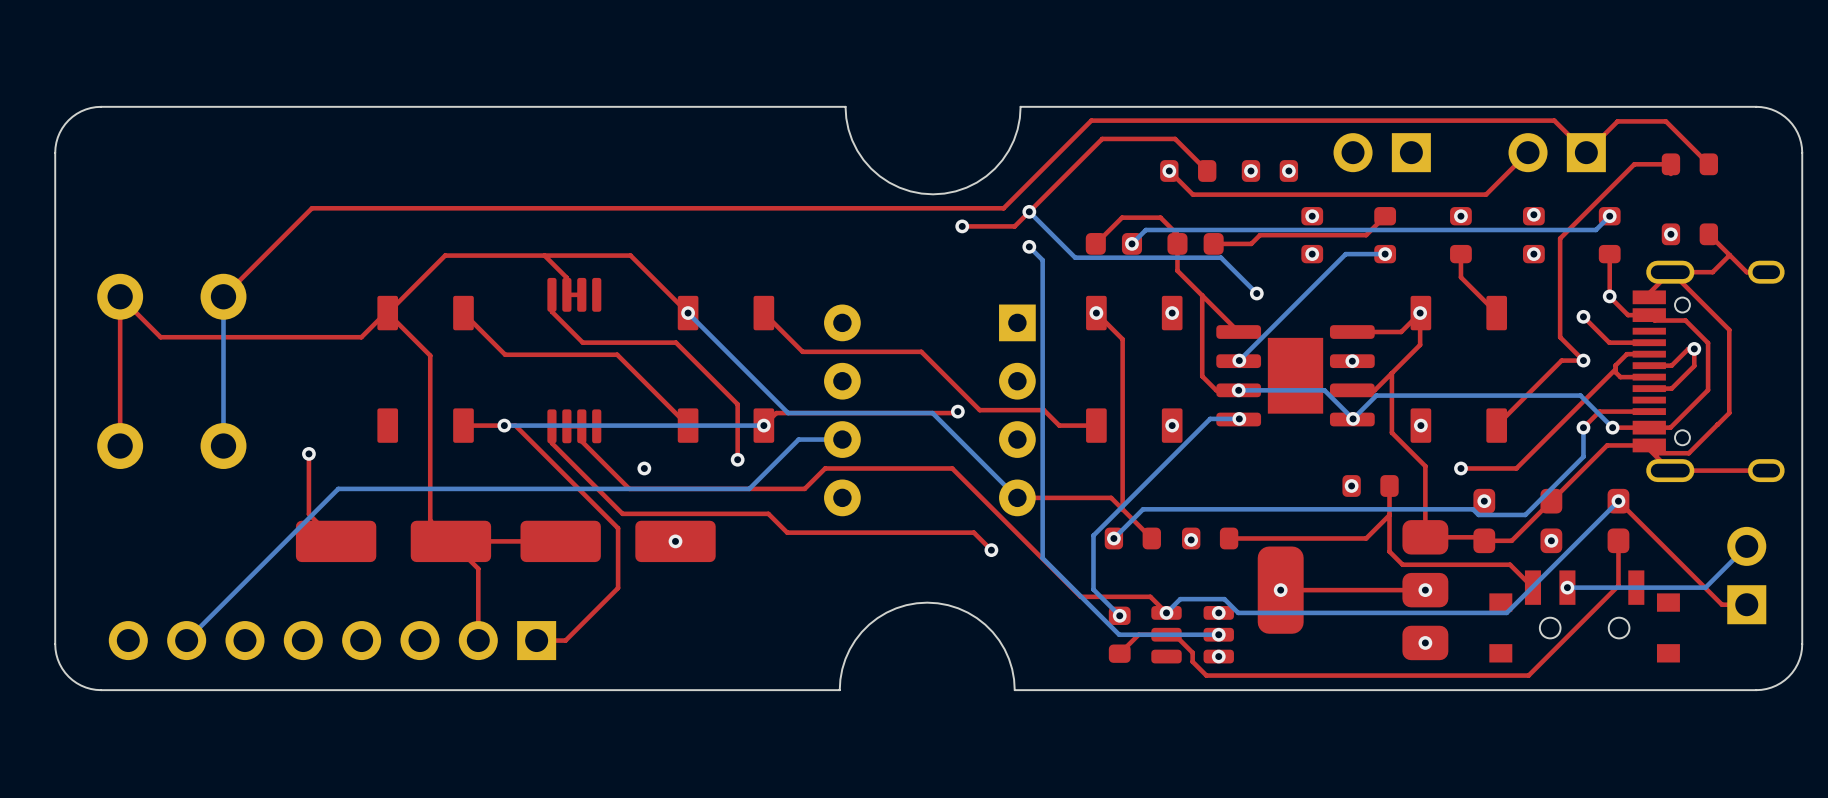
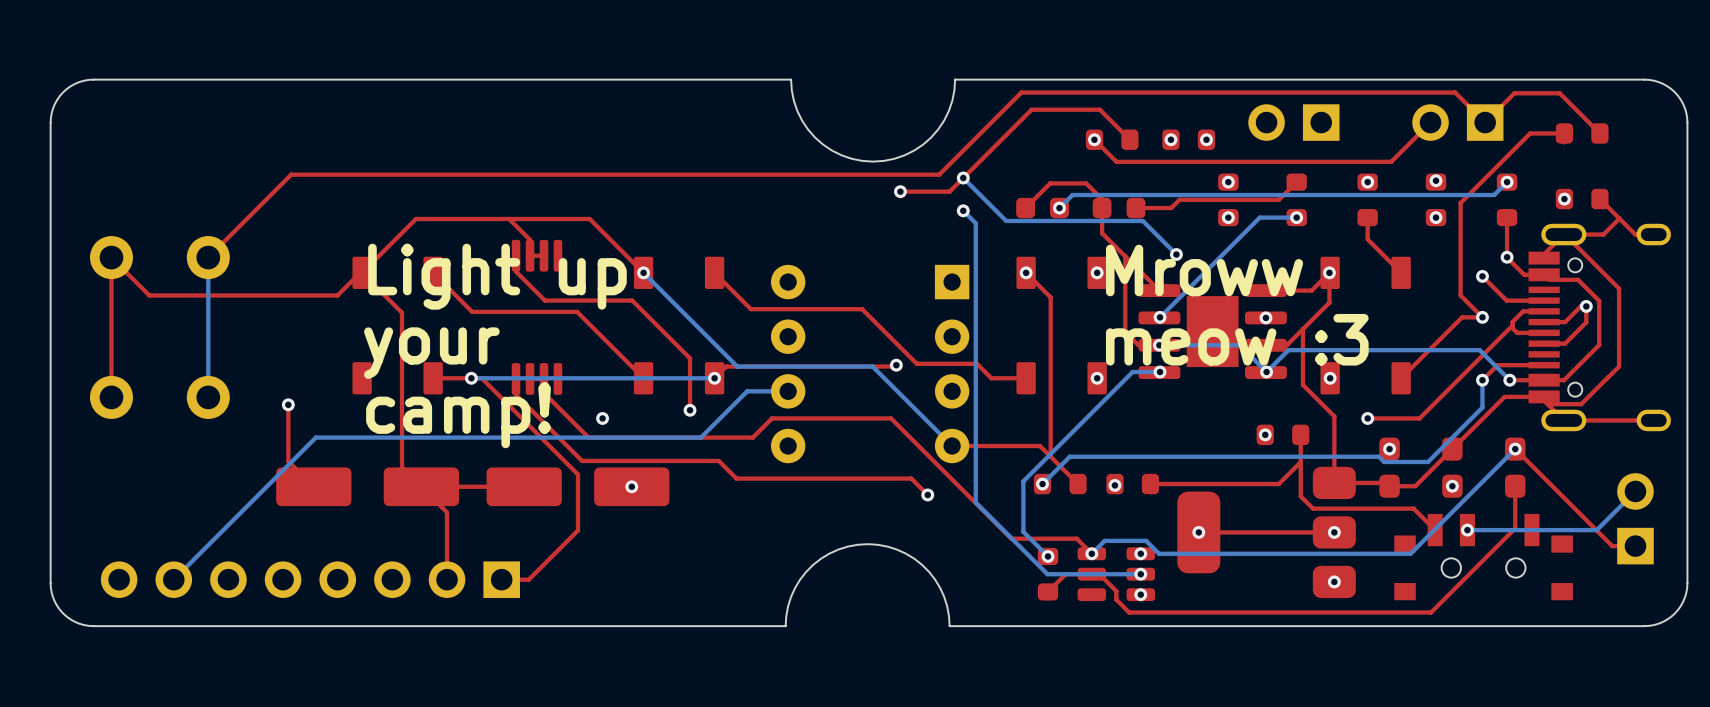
text: none -> Mroww (1204, 270)
text: none -> Light up (497, 276)
text: none -> meow :3 (1237, 339)
text: none -> your (431, 353)
text: none -> camp! (458, 415)

